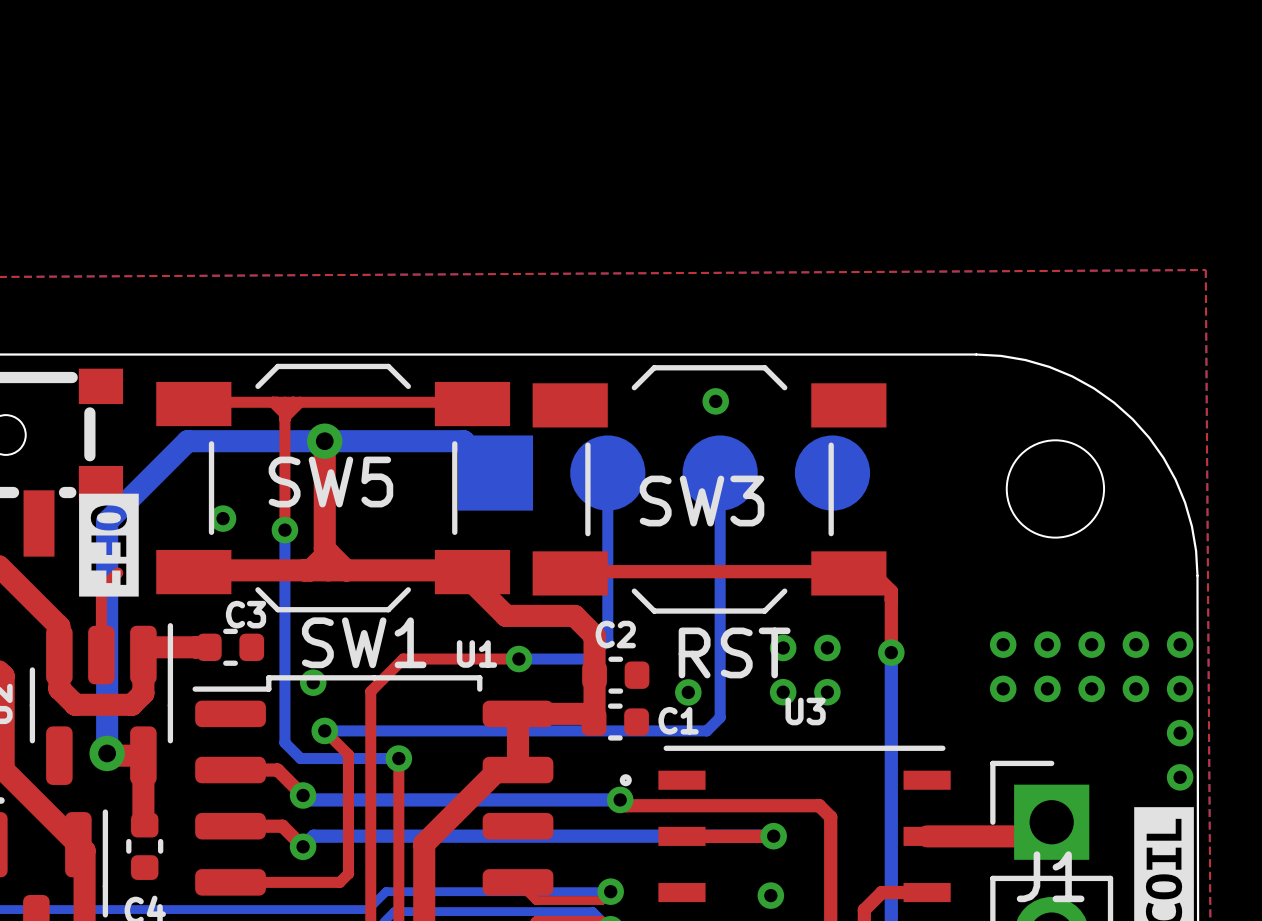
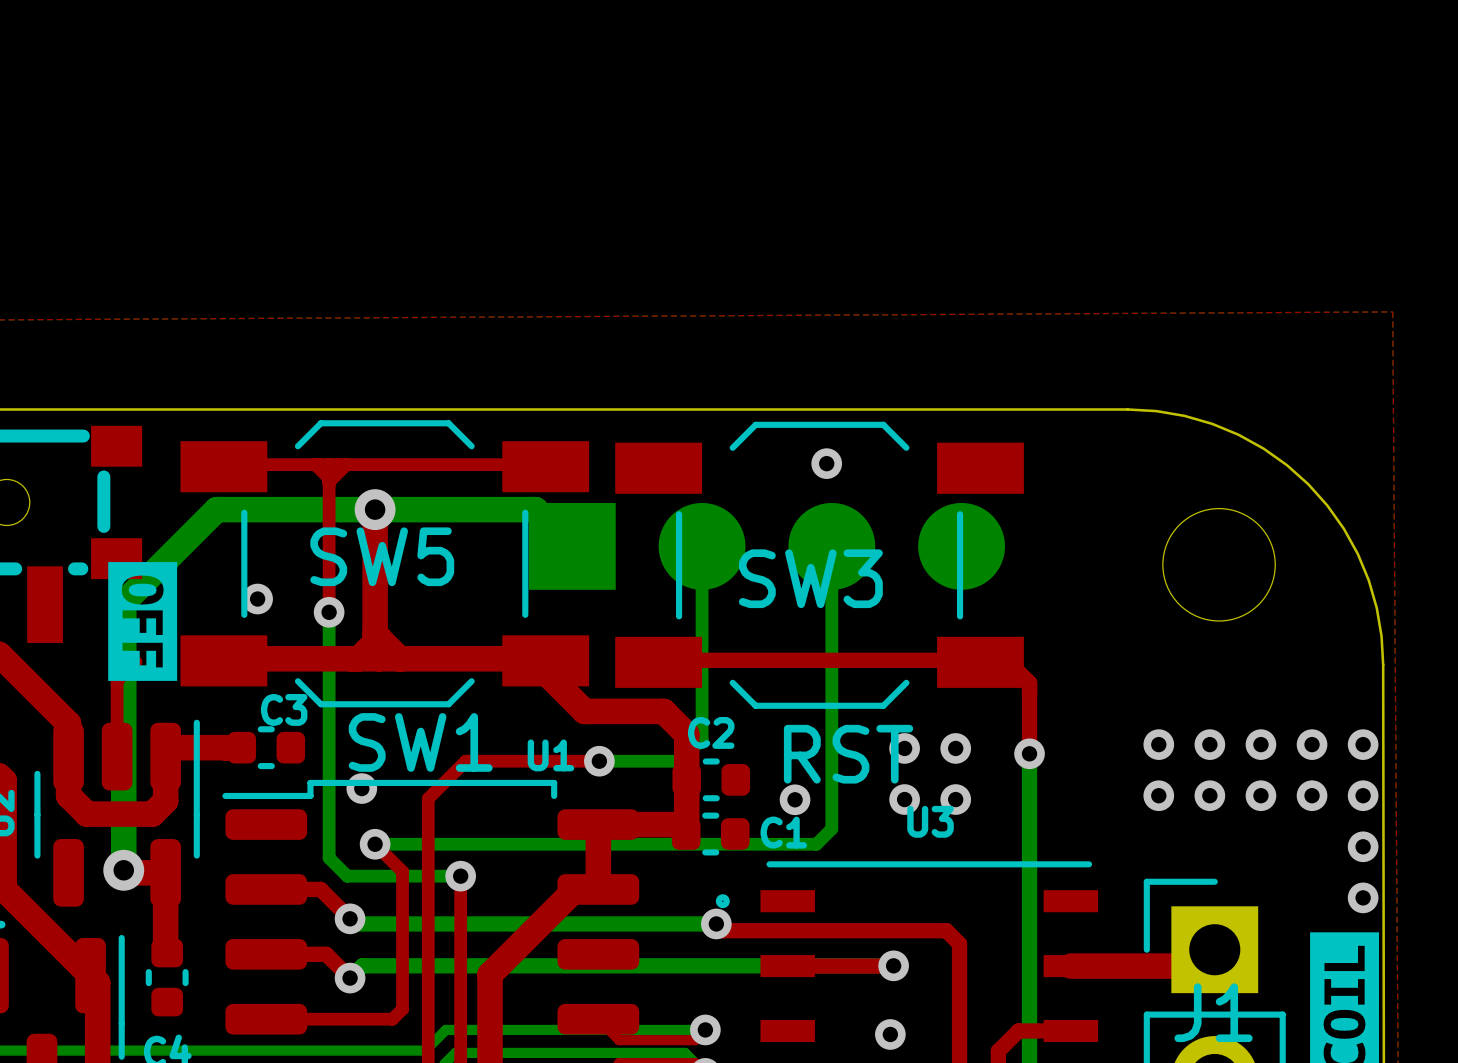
drawing position: (108, 545) -> (142, 621)

